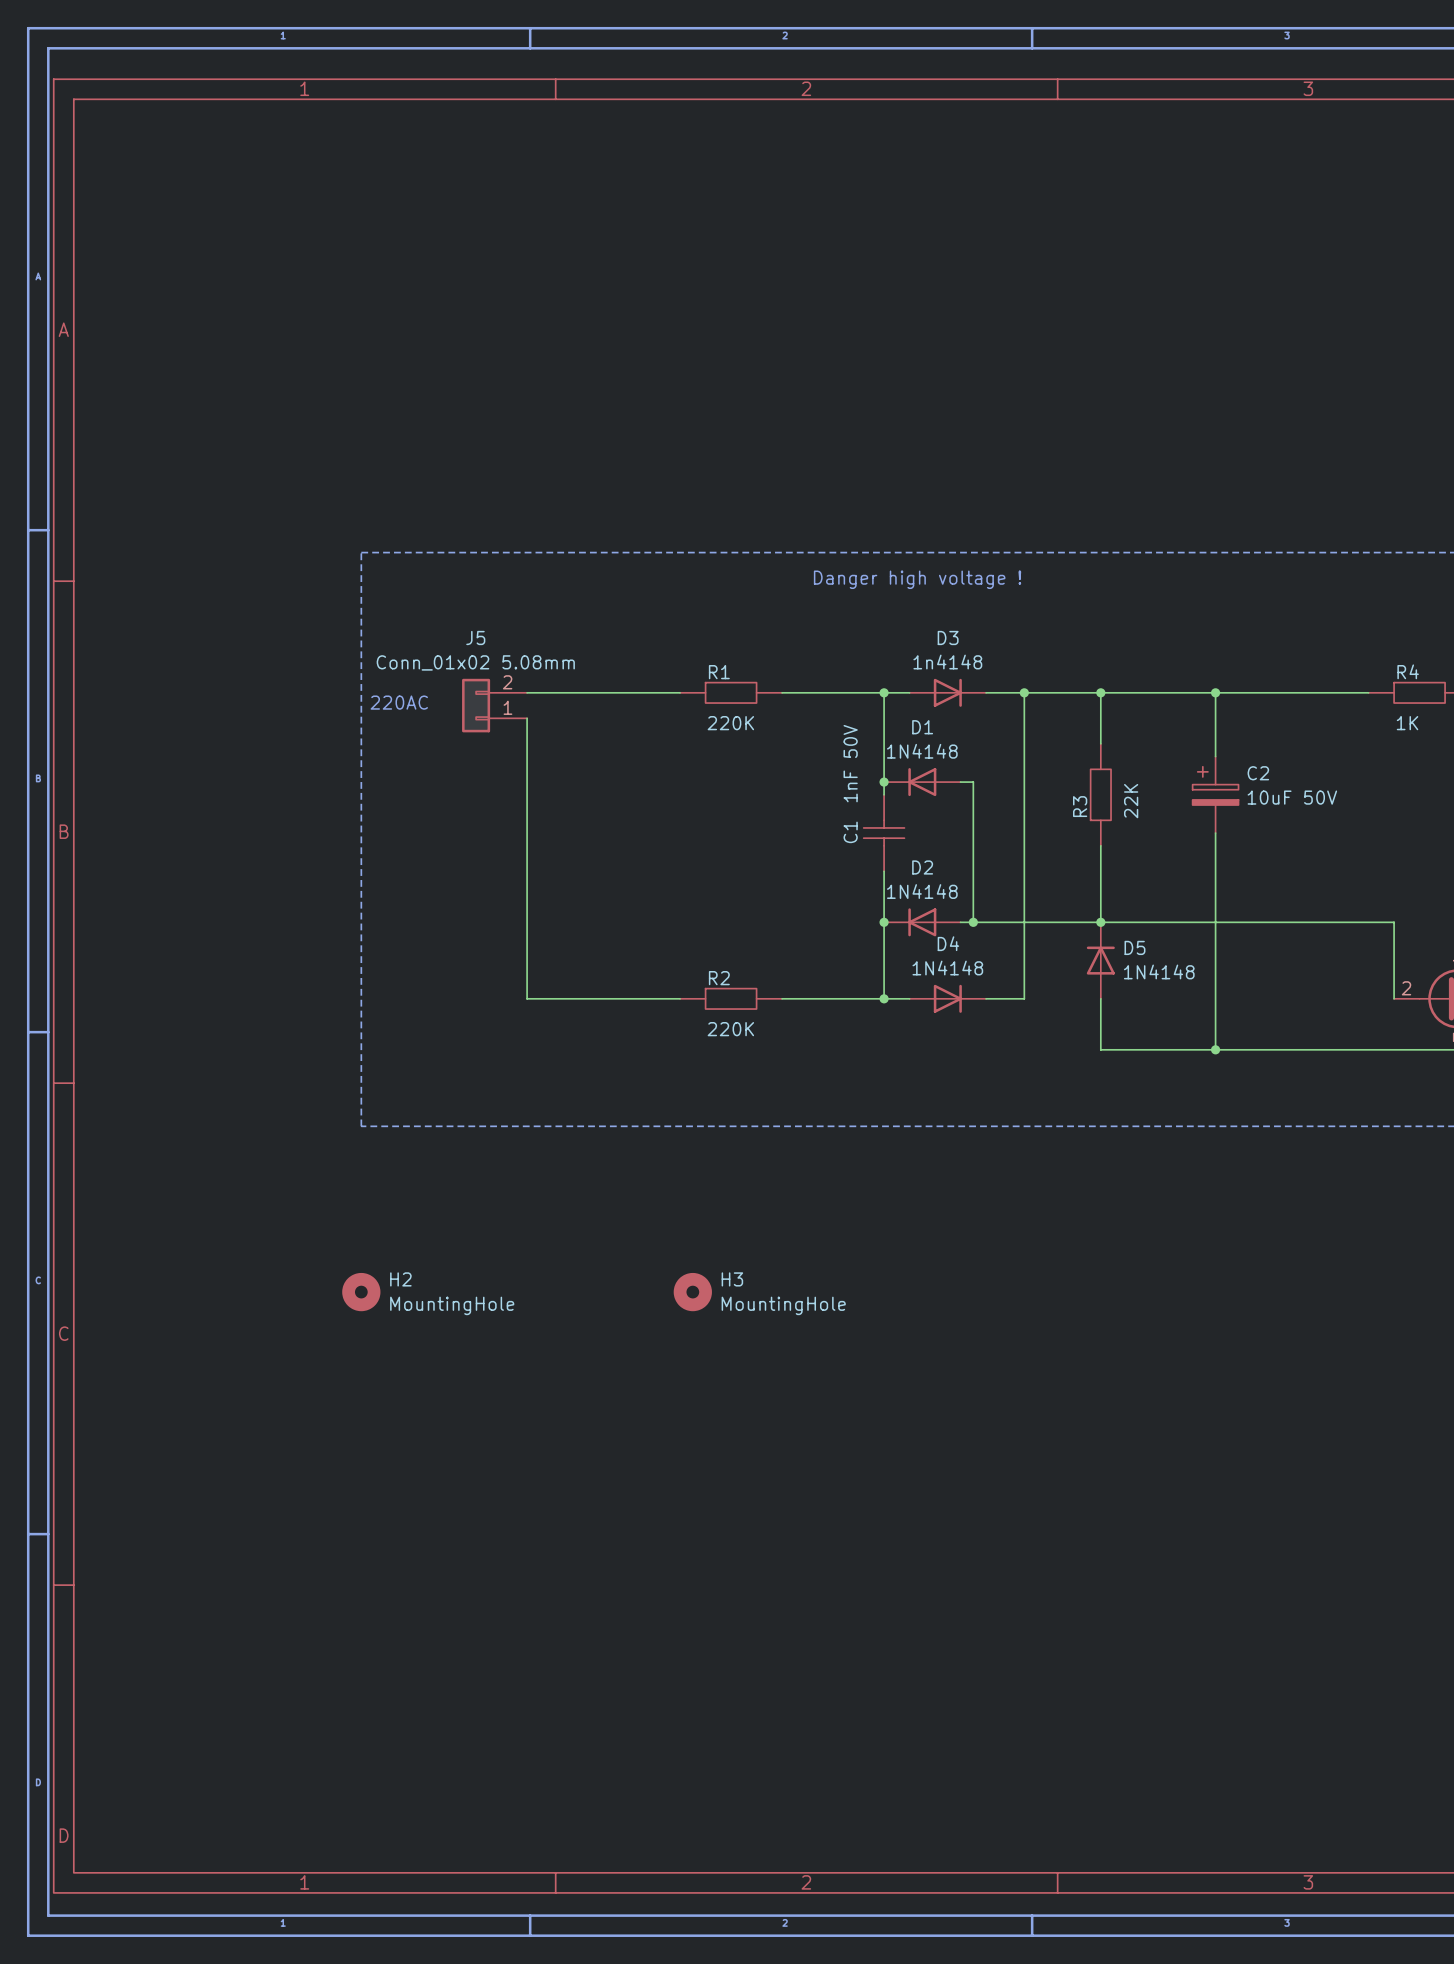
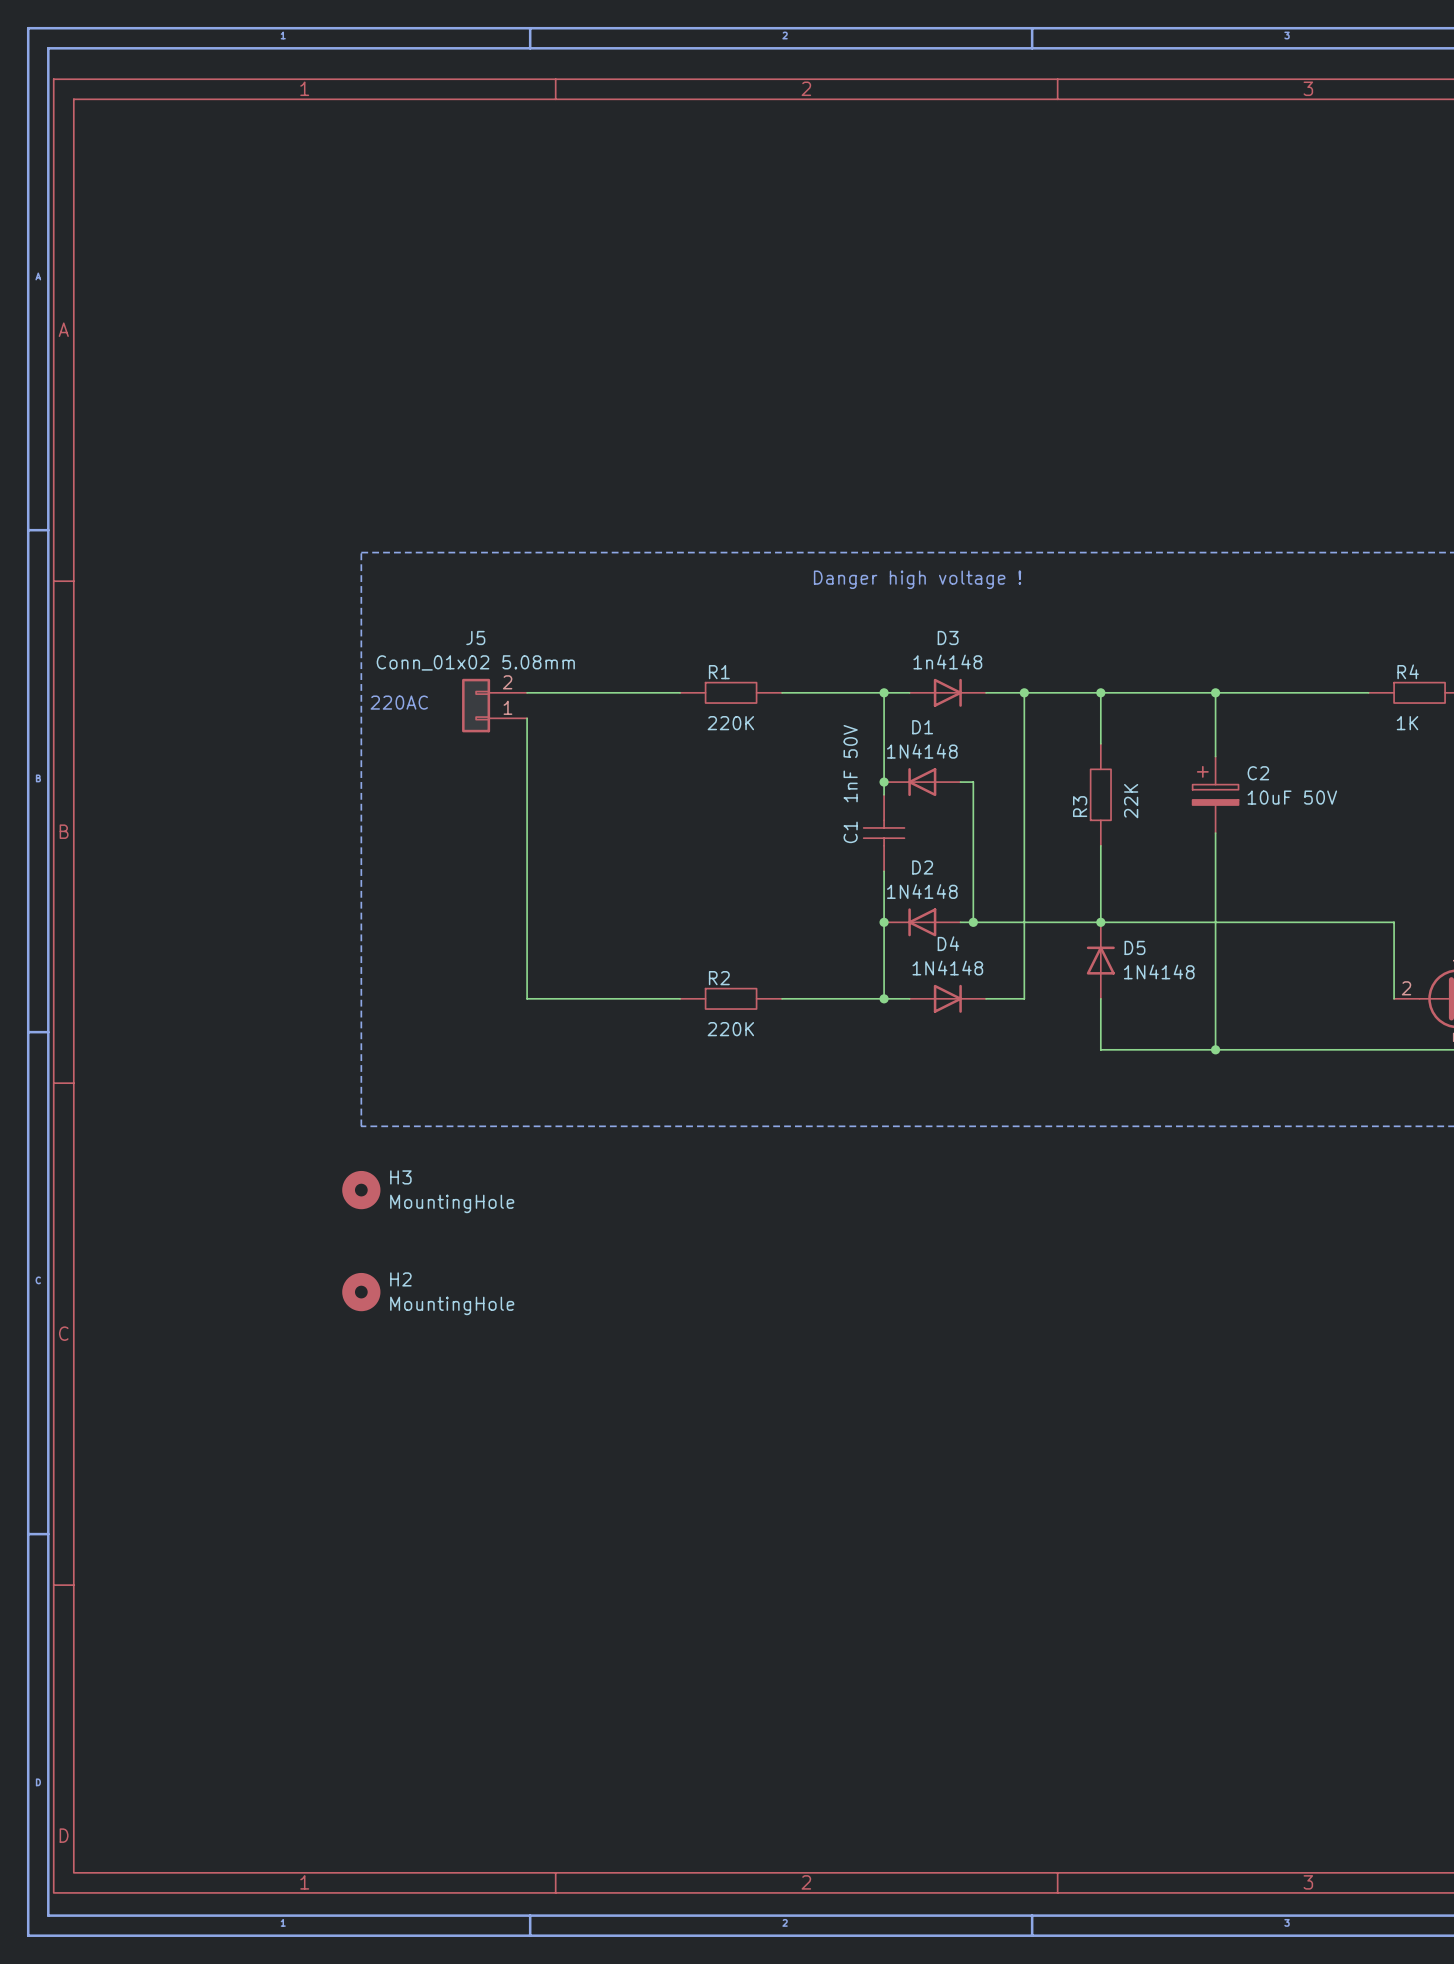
H3 position: (692, 1292) -> (361, 1190)

